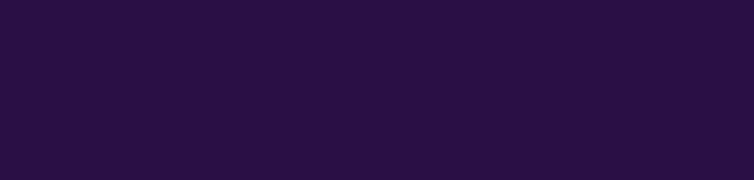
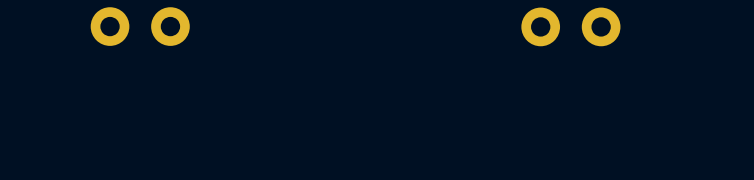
part: none -> (140, 26)
part: none -> (570, 26)

